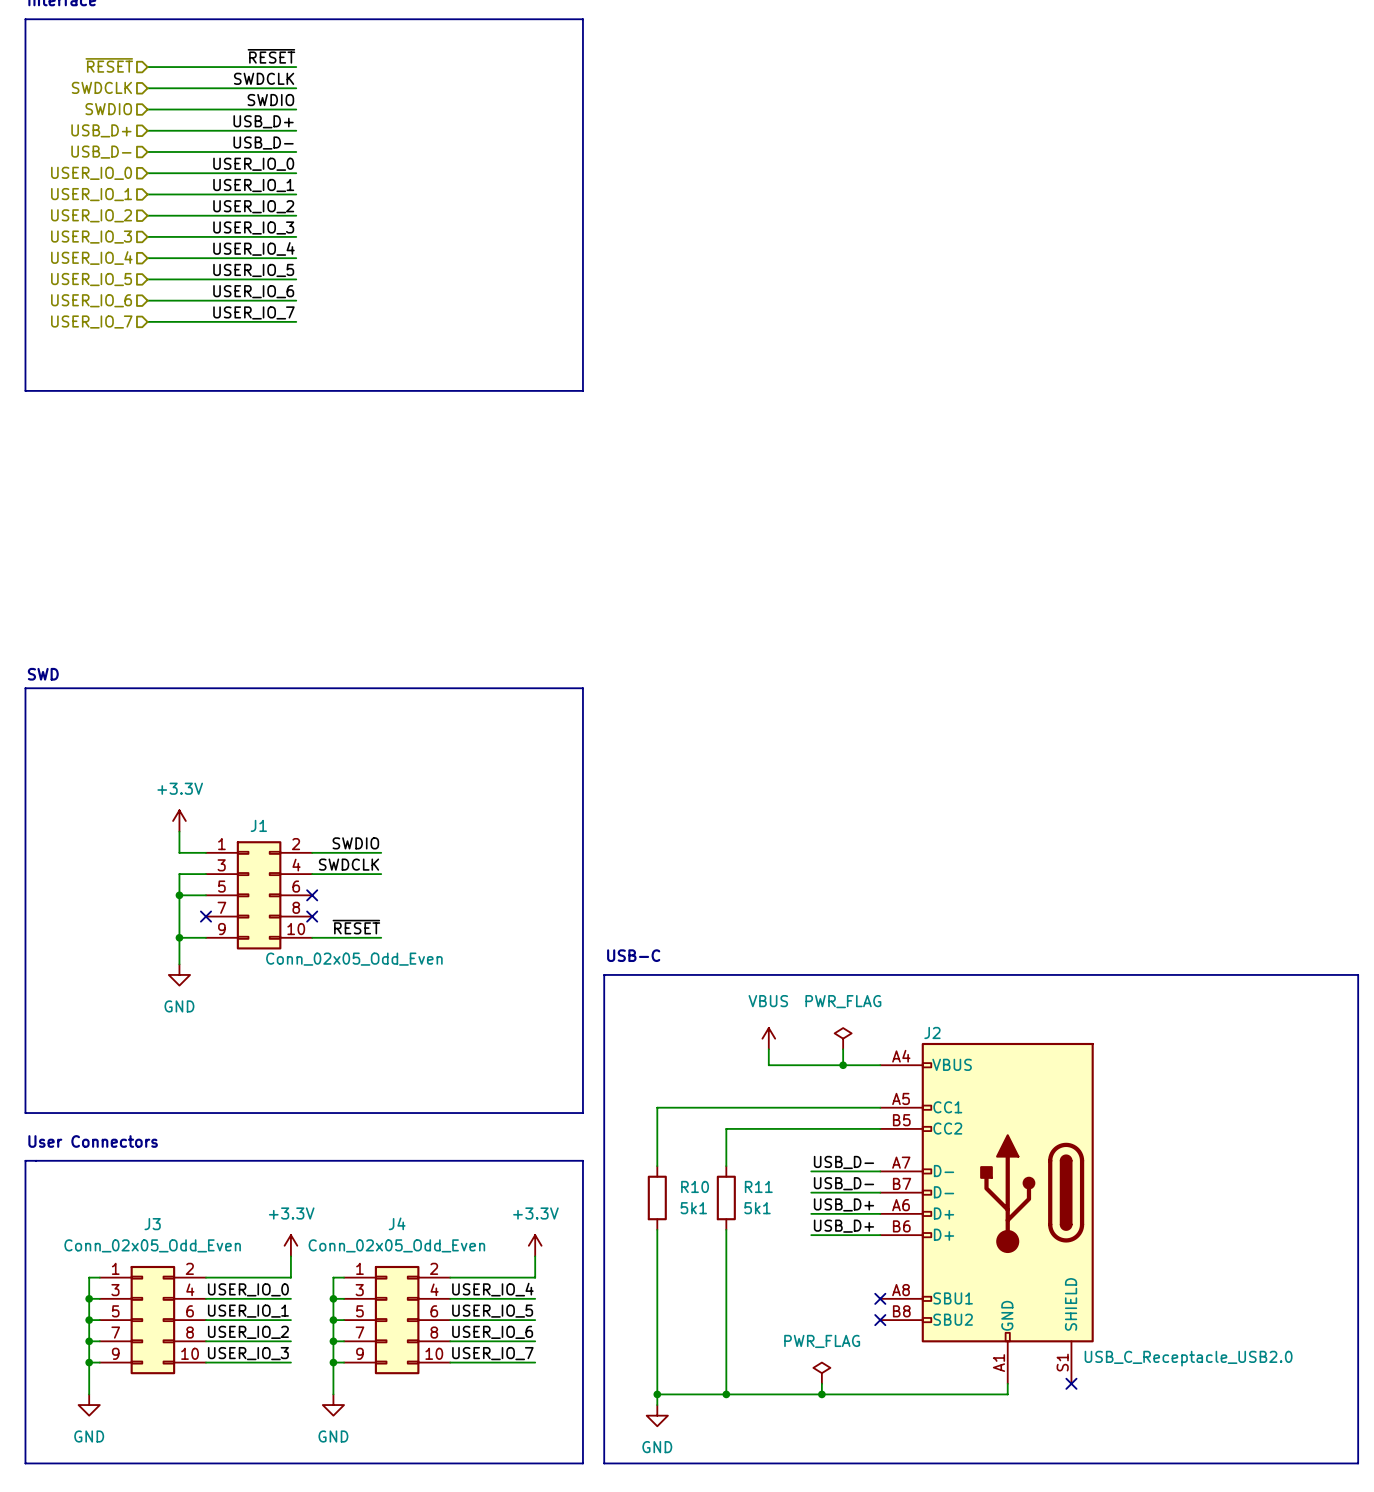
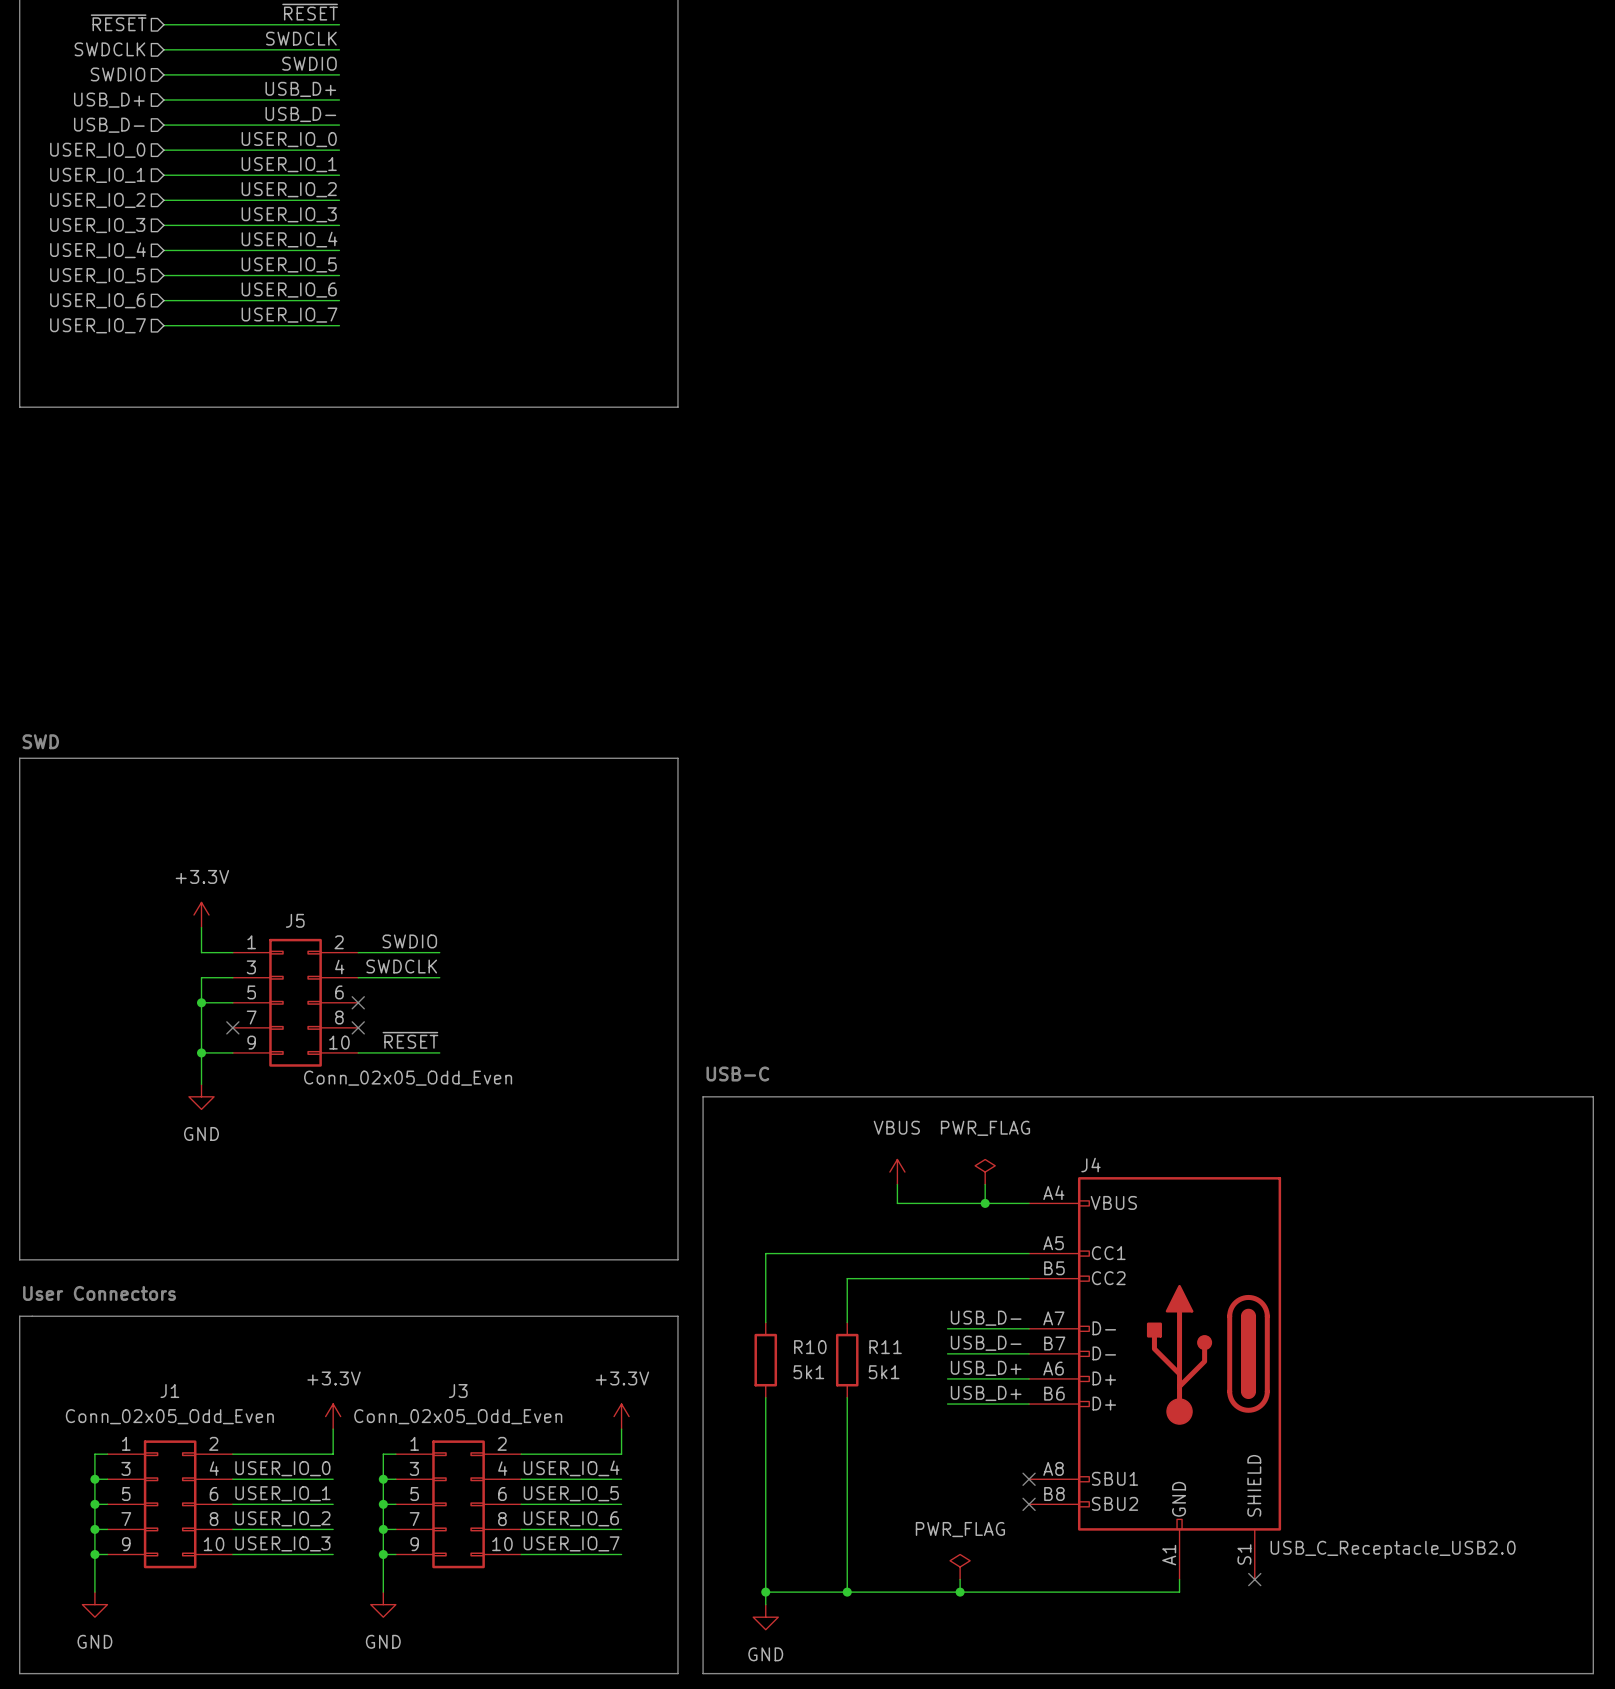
J1 name: J1 (258, 825) -> J5 (295, 920)
J2 name: J2 (932, 1032) -> J4 (1090, 1165)
J4 name: J4 (397, 1223) -> J3 (458, 1391)
J3 name: J3 (152, 1224) -> J1 (169, 1391)

